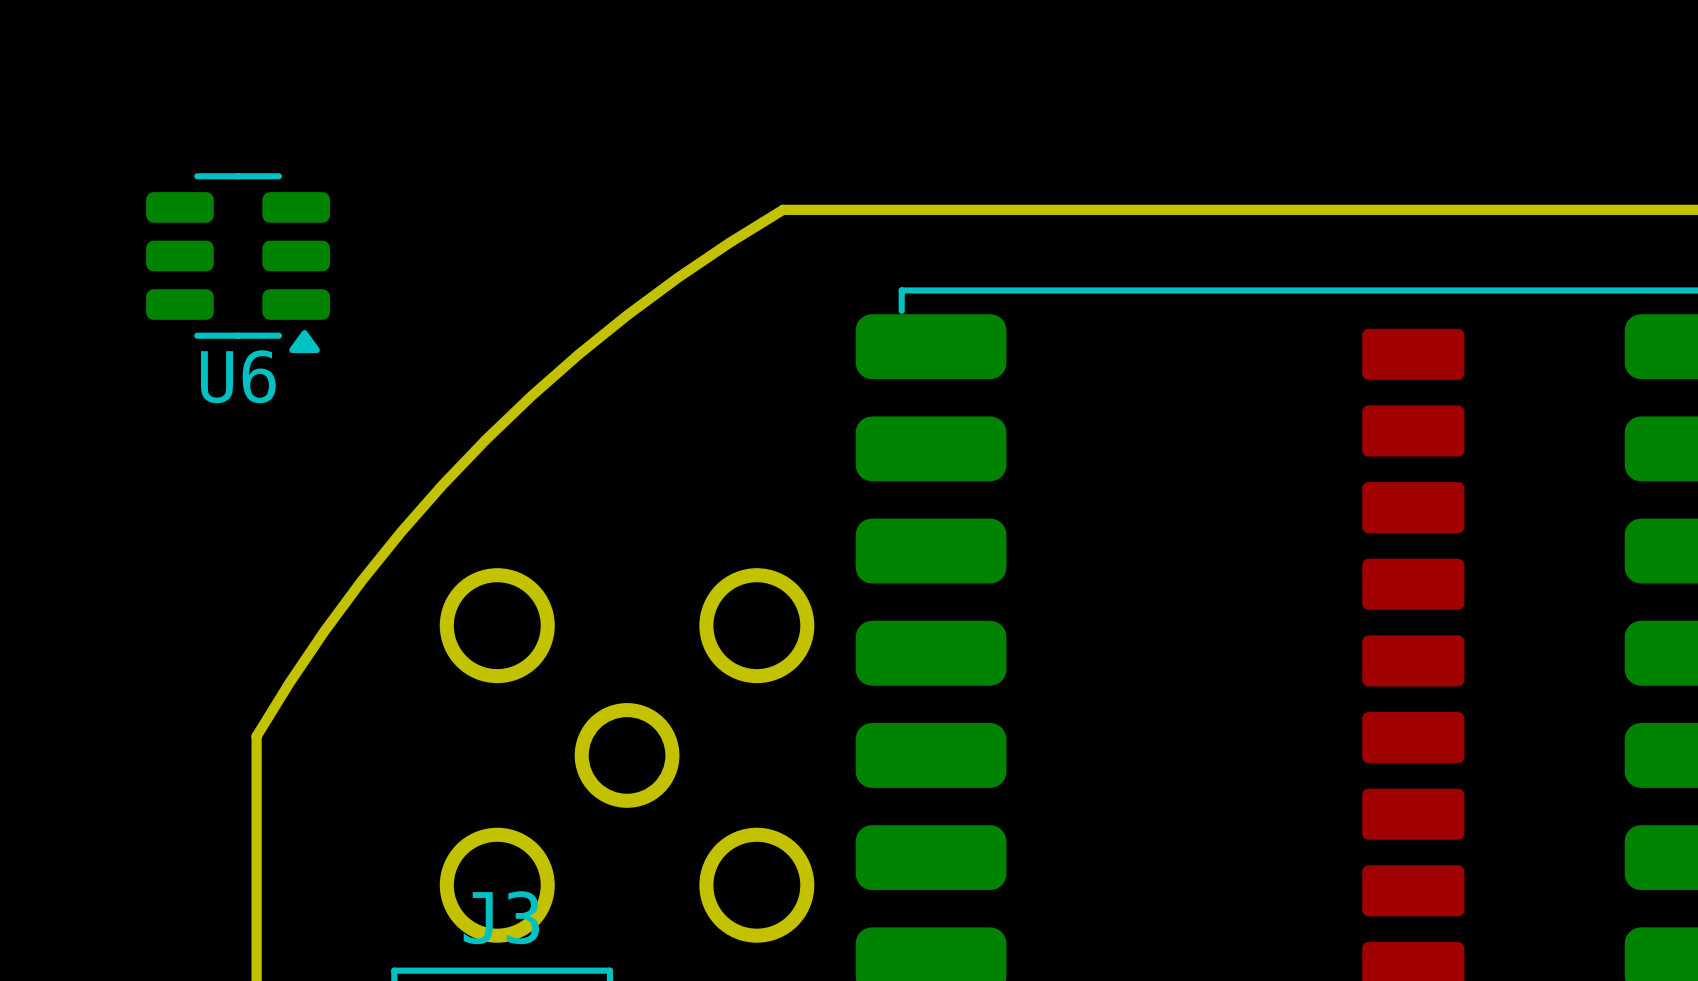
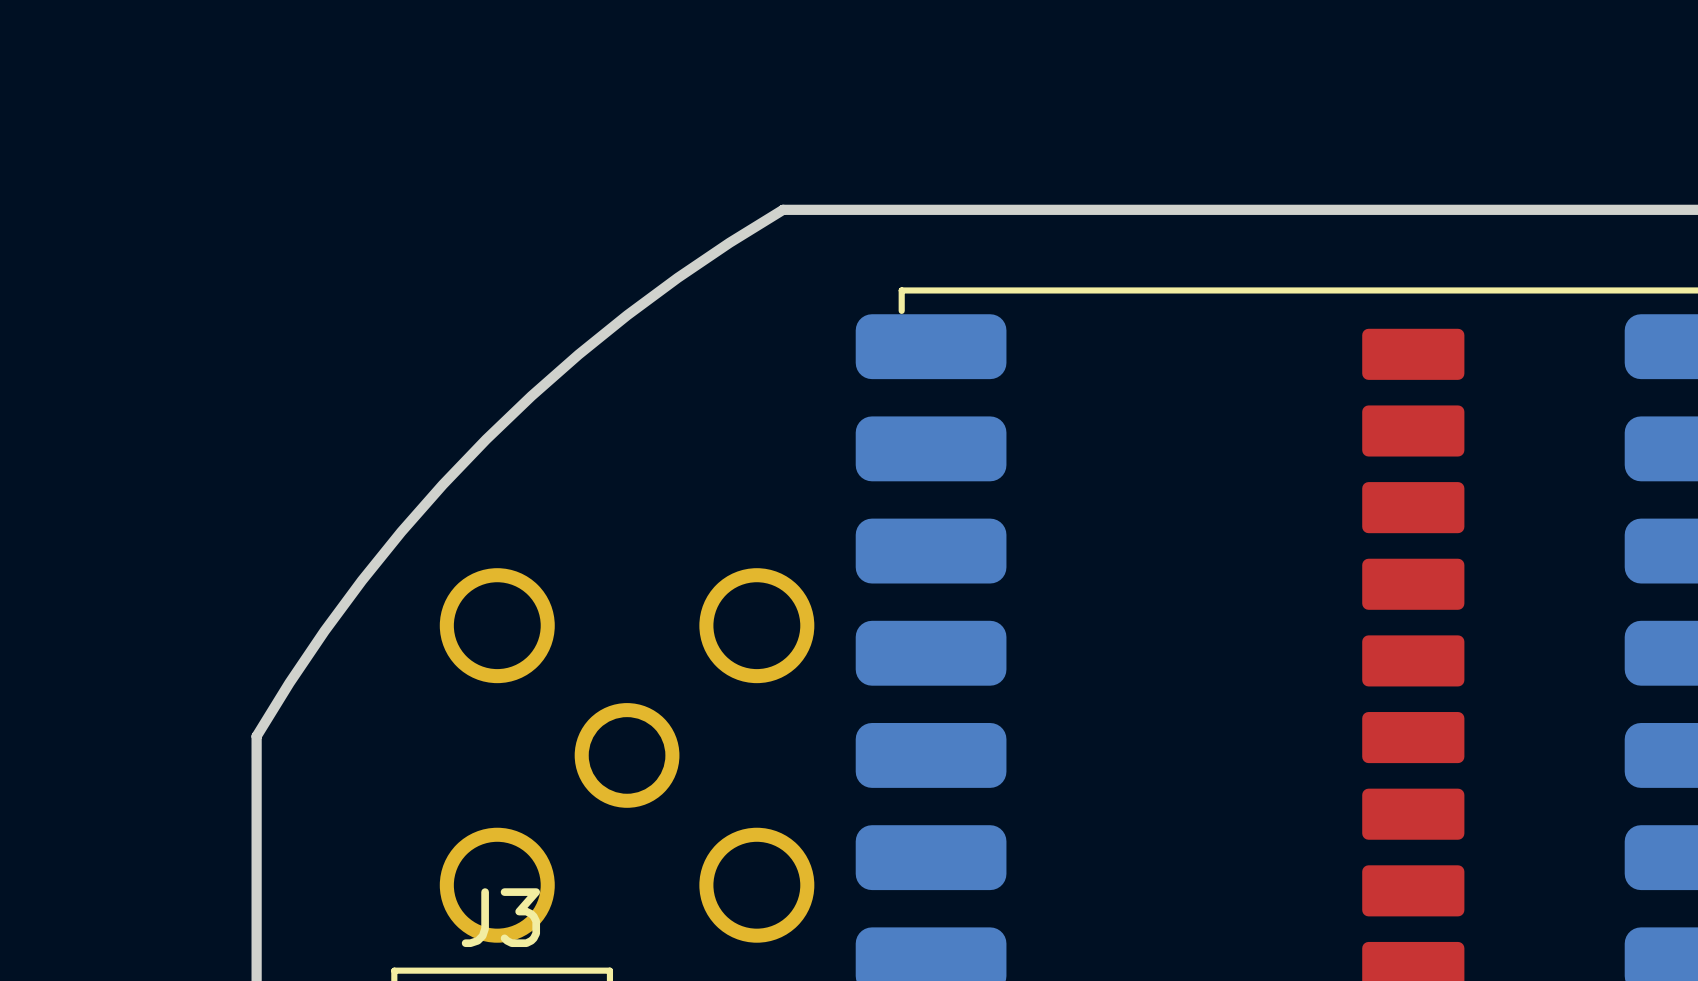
U6: (238, 263) -> none

